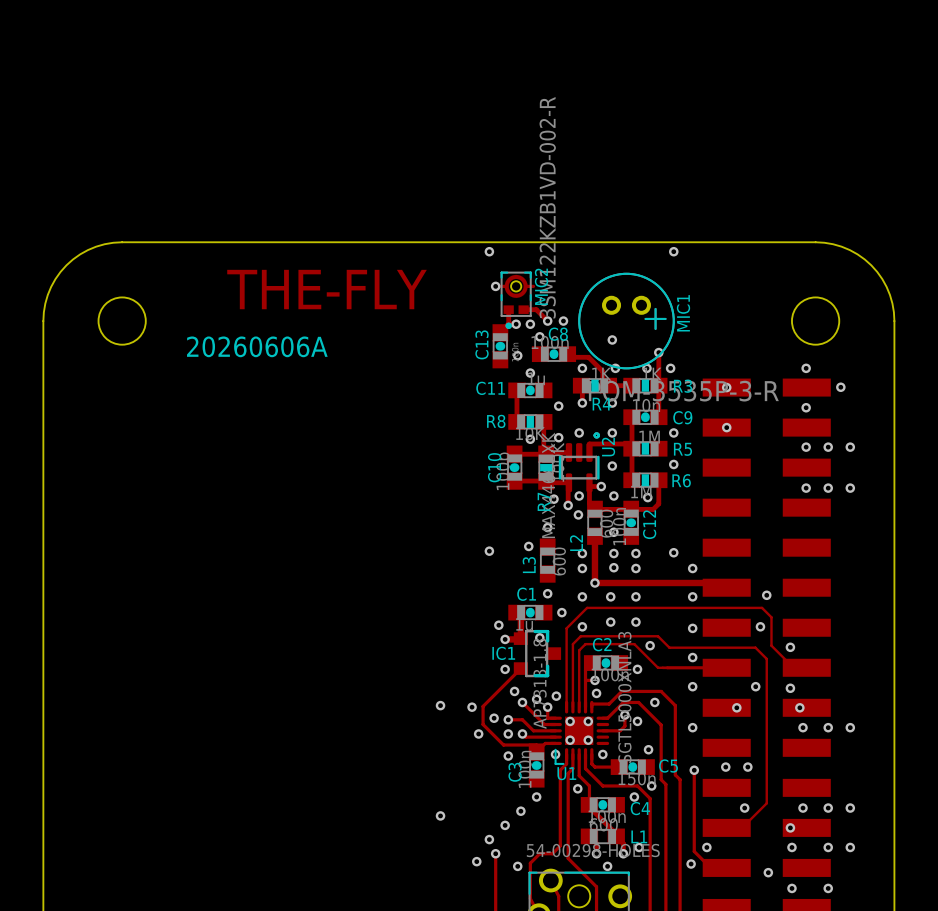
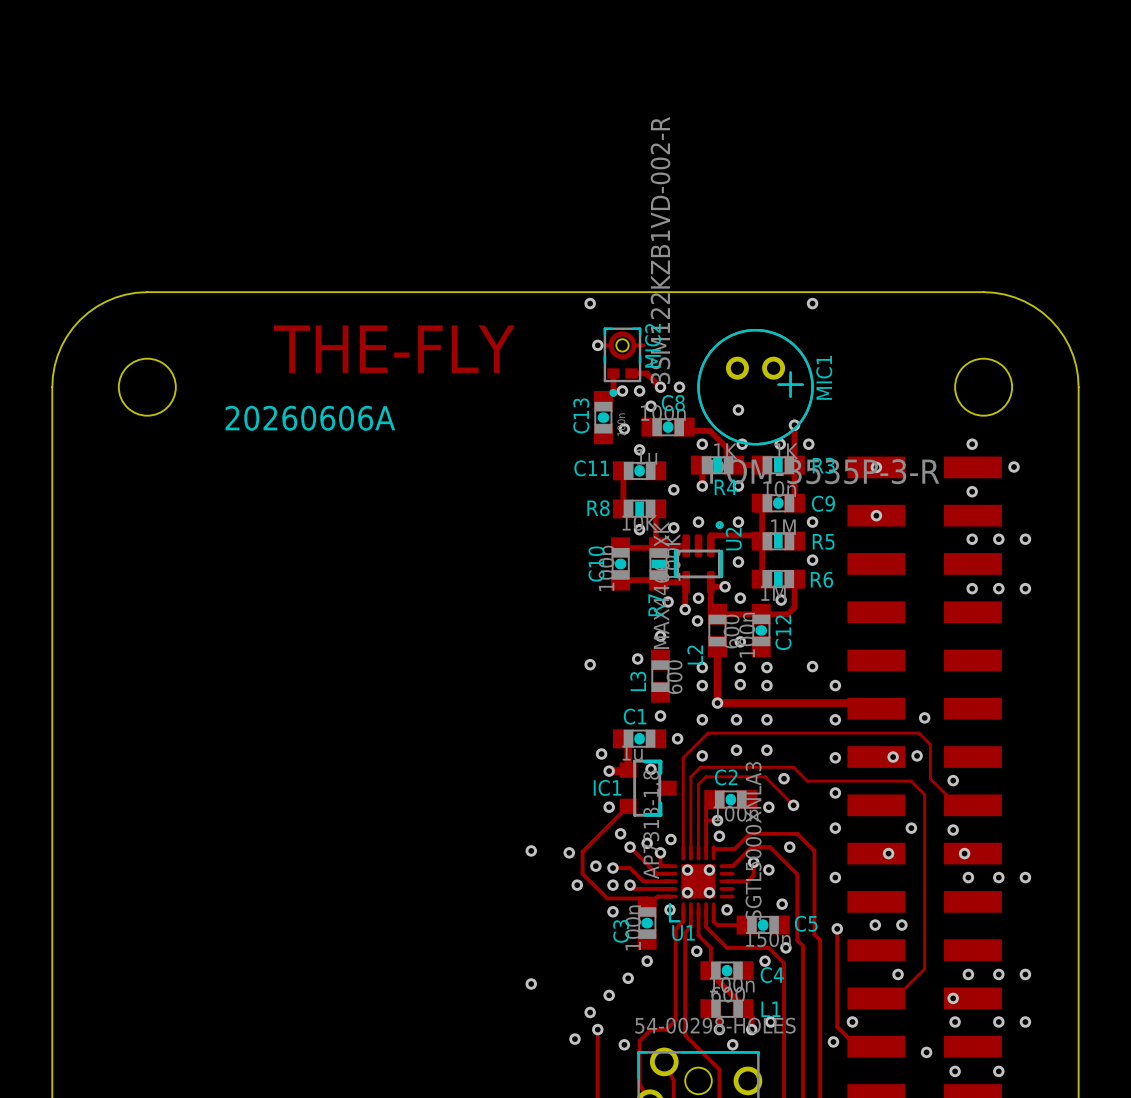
via: none -> (893, 757)
track: (658, 667) (726, 667) -> none
via: none -> (793, 805)

